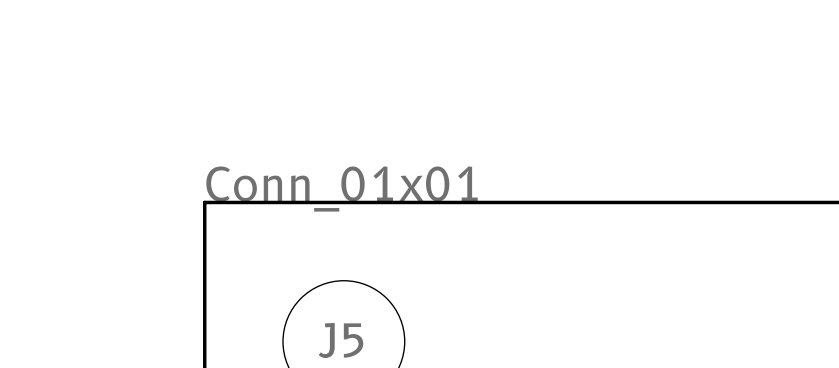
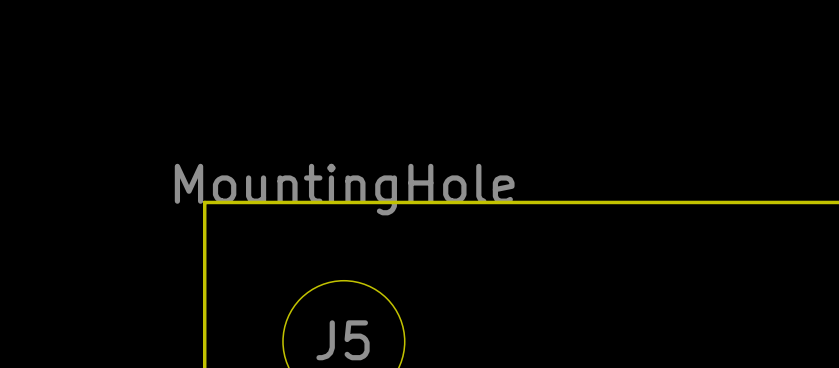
J5 value: Conn_01x01 (342, 188) -> MountingHole (344, 189)

